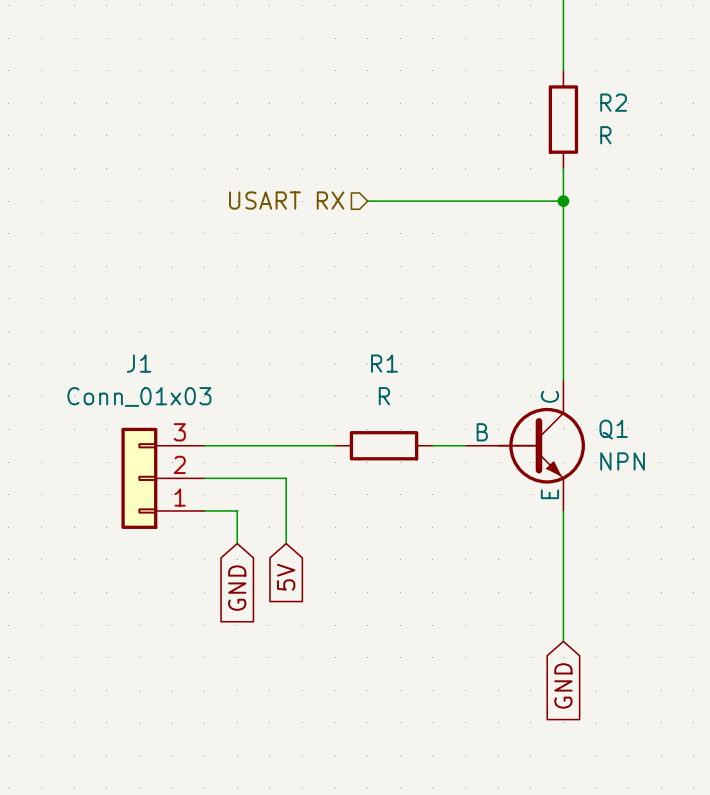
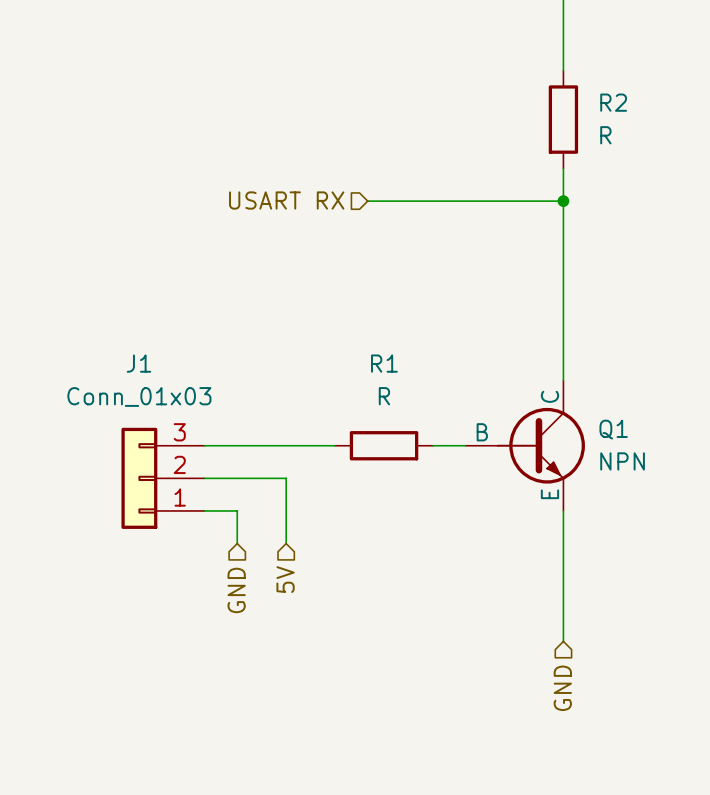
global label: 5V (286, 577) -> none
hierarchical label: none -> 5V (285, 579)
global label: GND (237, 588) -> none
hierarchical label: none -> GND (236, 590)
global label: GND (563, 685) -> none
hierarchical label: none -> GND (562, 688)

